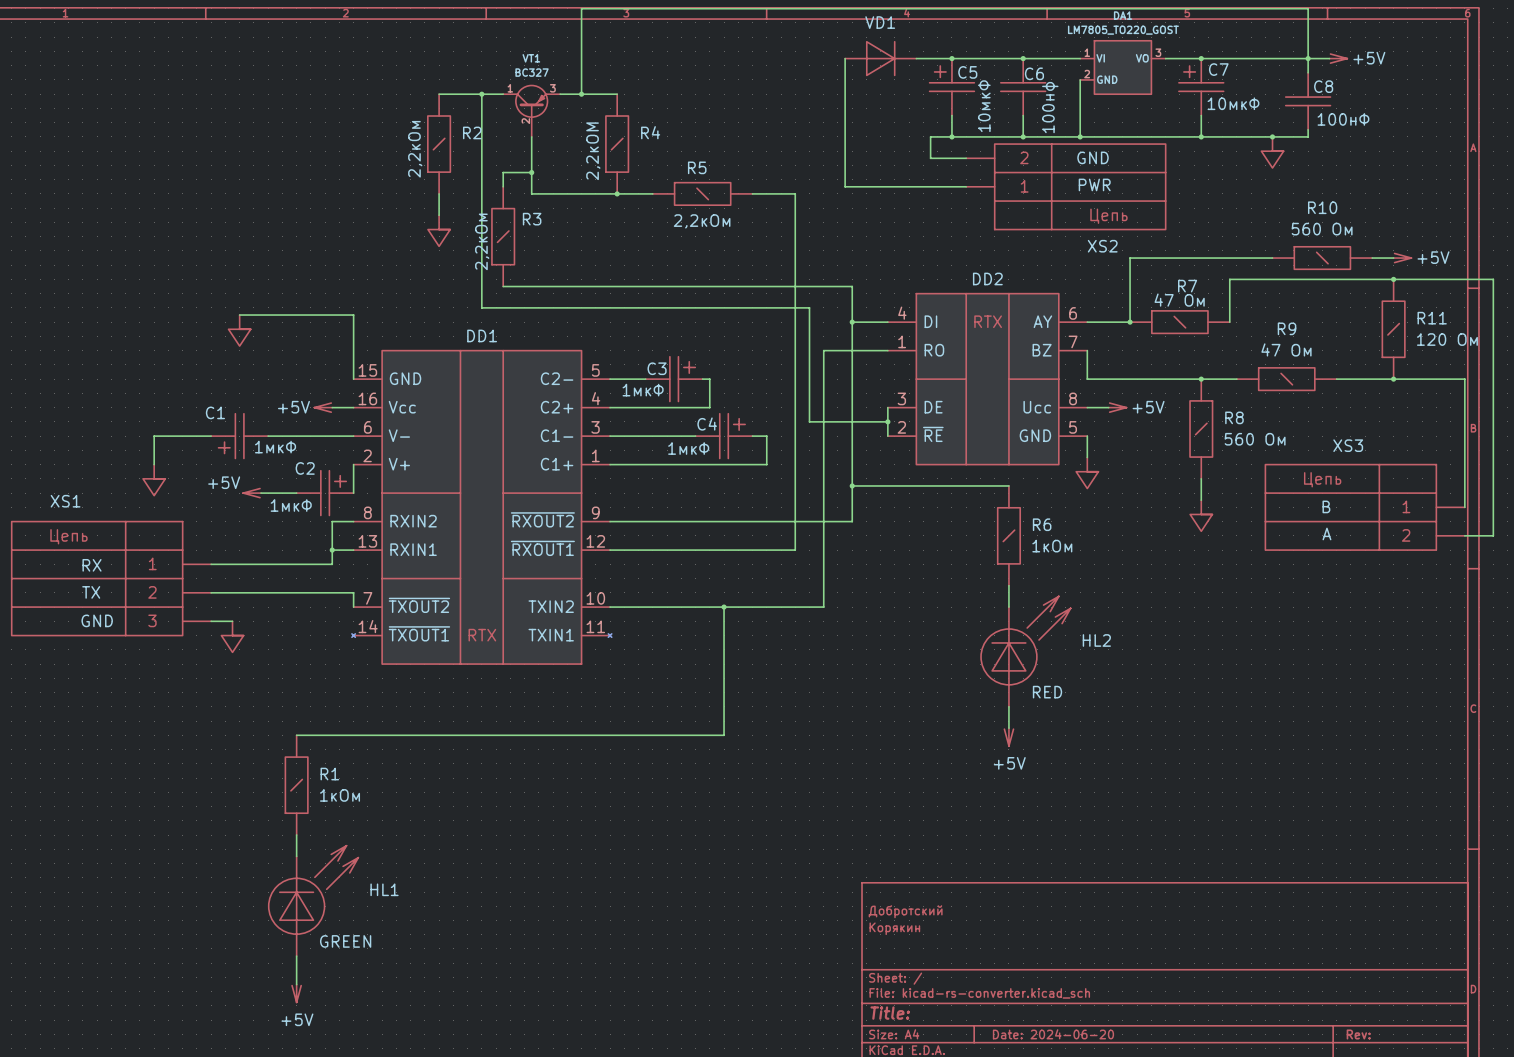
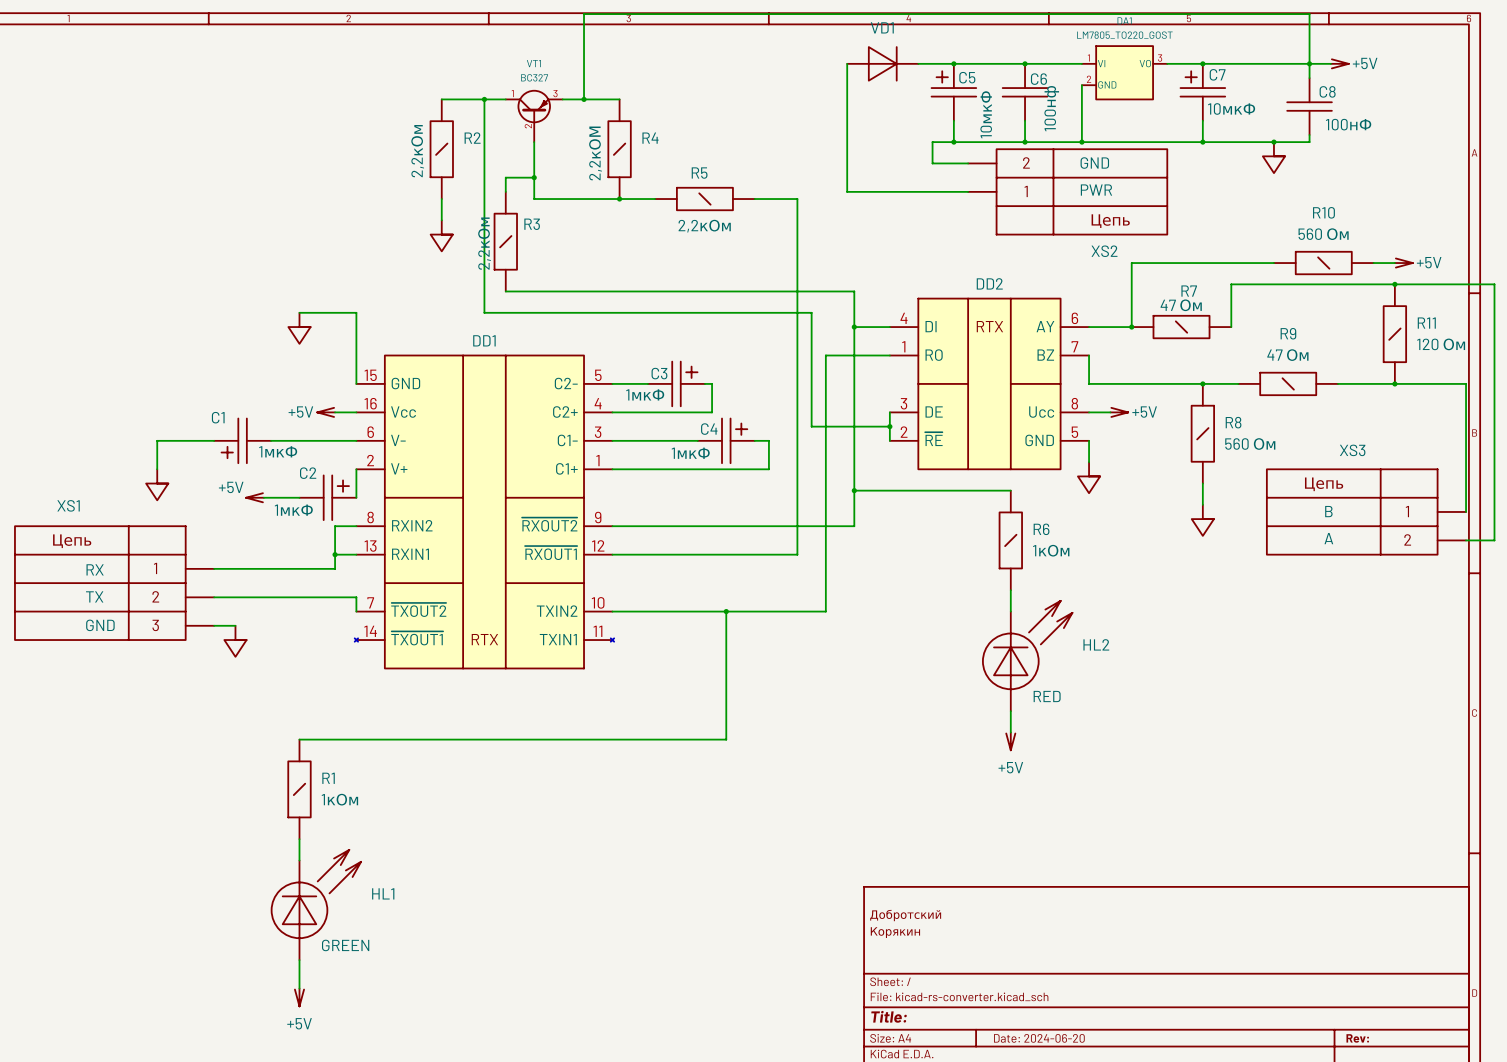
wire: (239, 315) (353, 315) -> (299, 312) (356, 312) (356, 319)
power symbol position: (239, 330) -> (299, 328)

